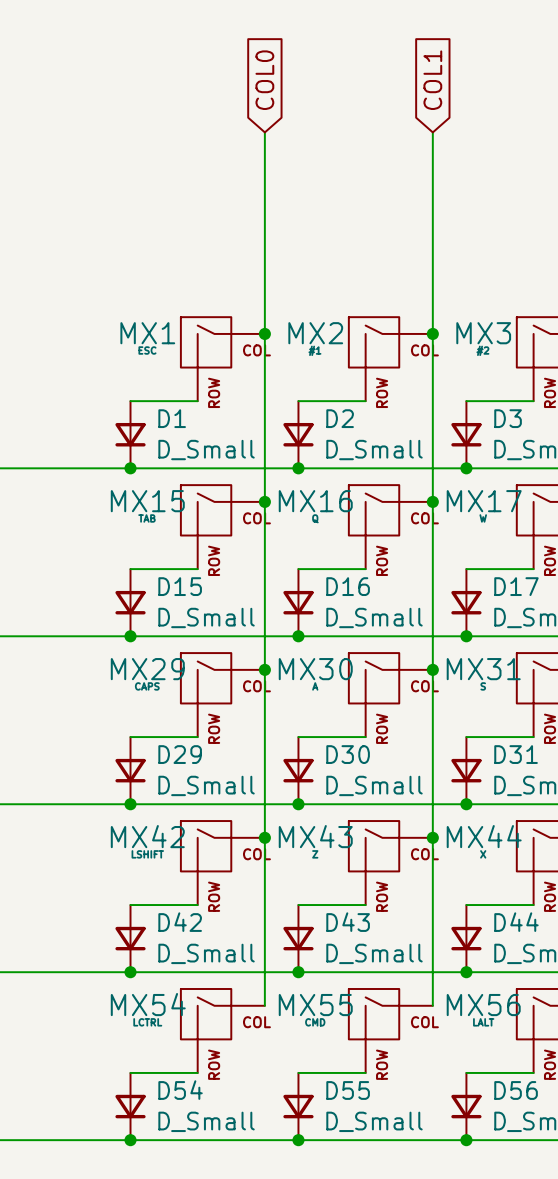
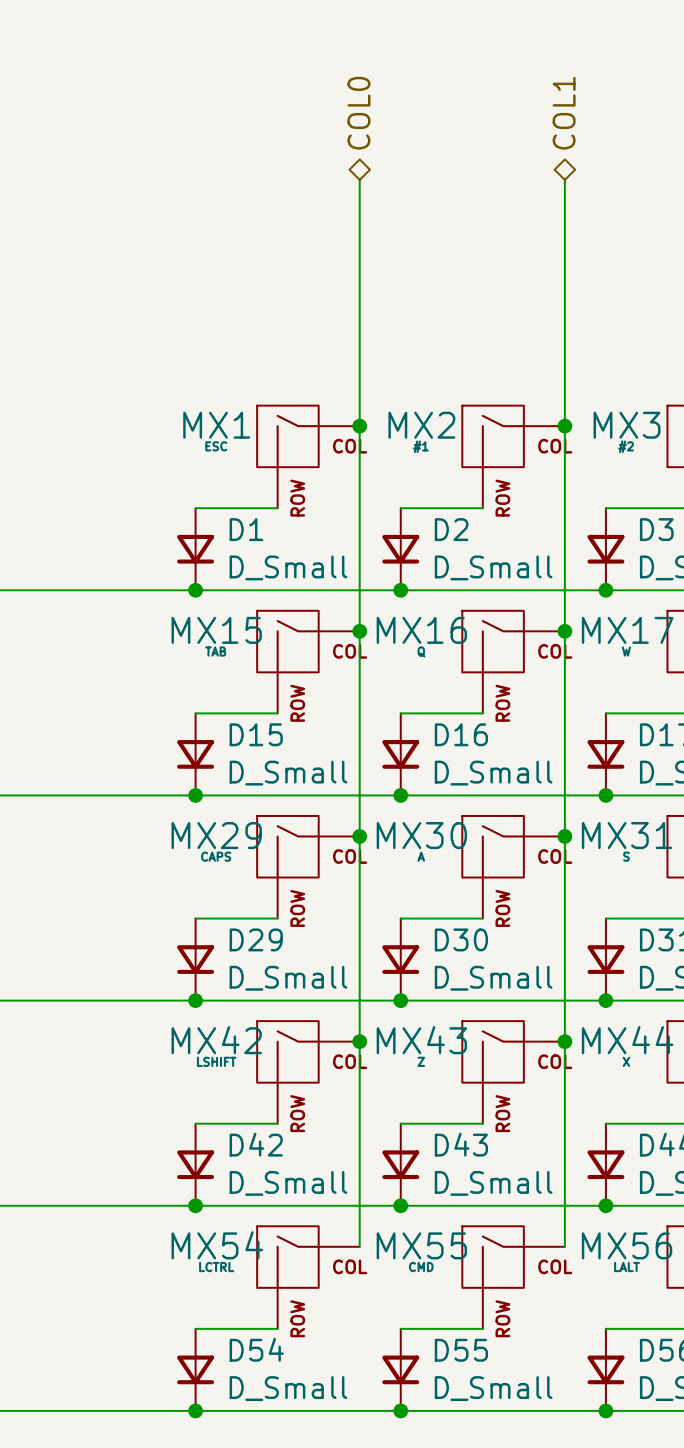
hierarchical label: none -> COL0 (358, 113)
hierarchical label: none -> COL1 (564, 113)
global label: COL0 (264, 80) -> none
global label: COL1 (432, 80) -> none

